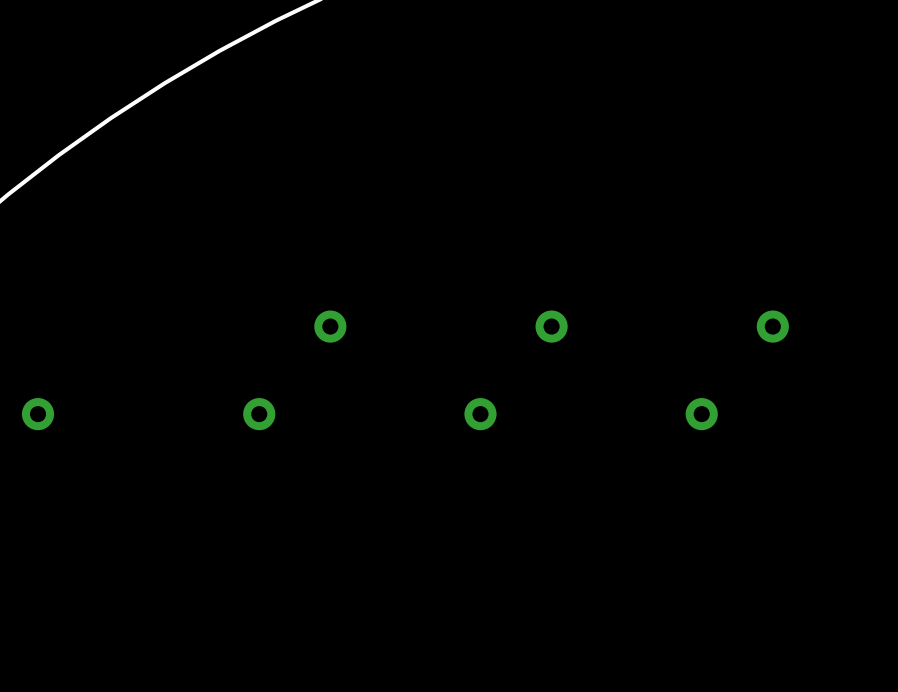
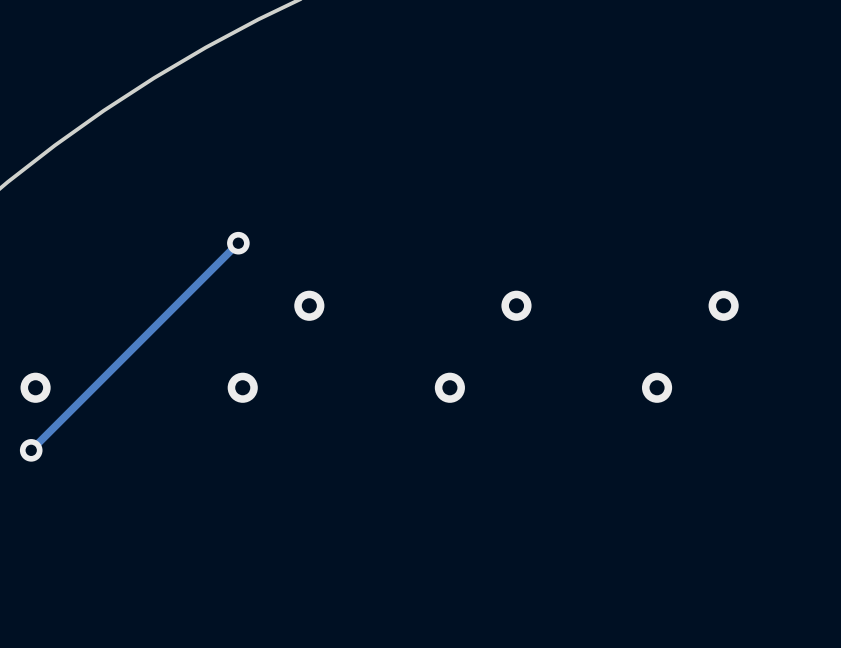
track: none -> (238, 243) (31, 450)
via: none -> (238, 243)
via: none -> (31, 450)

